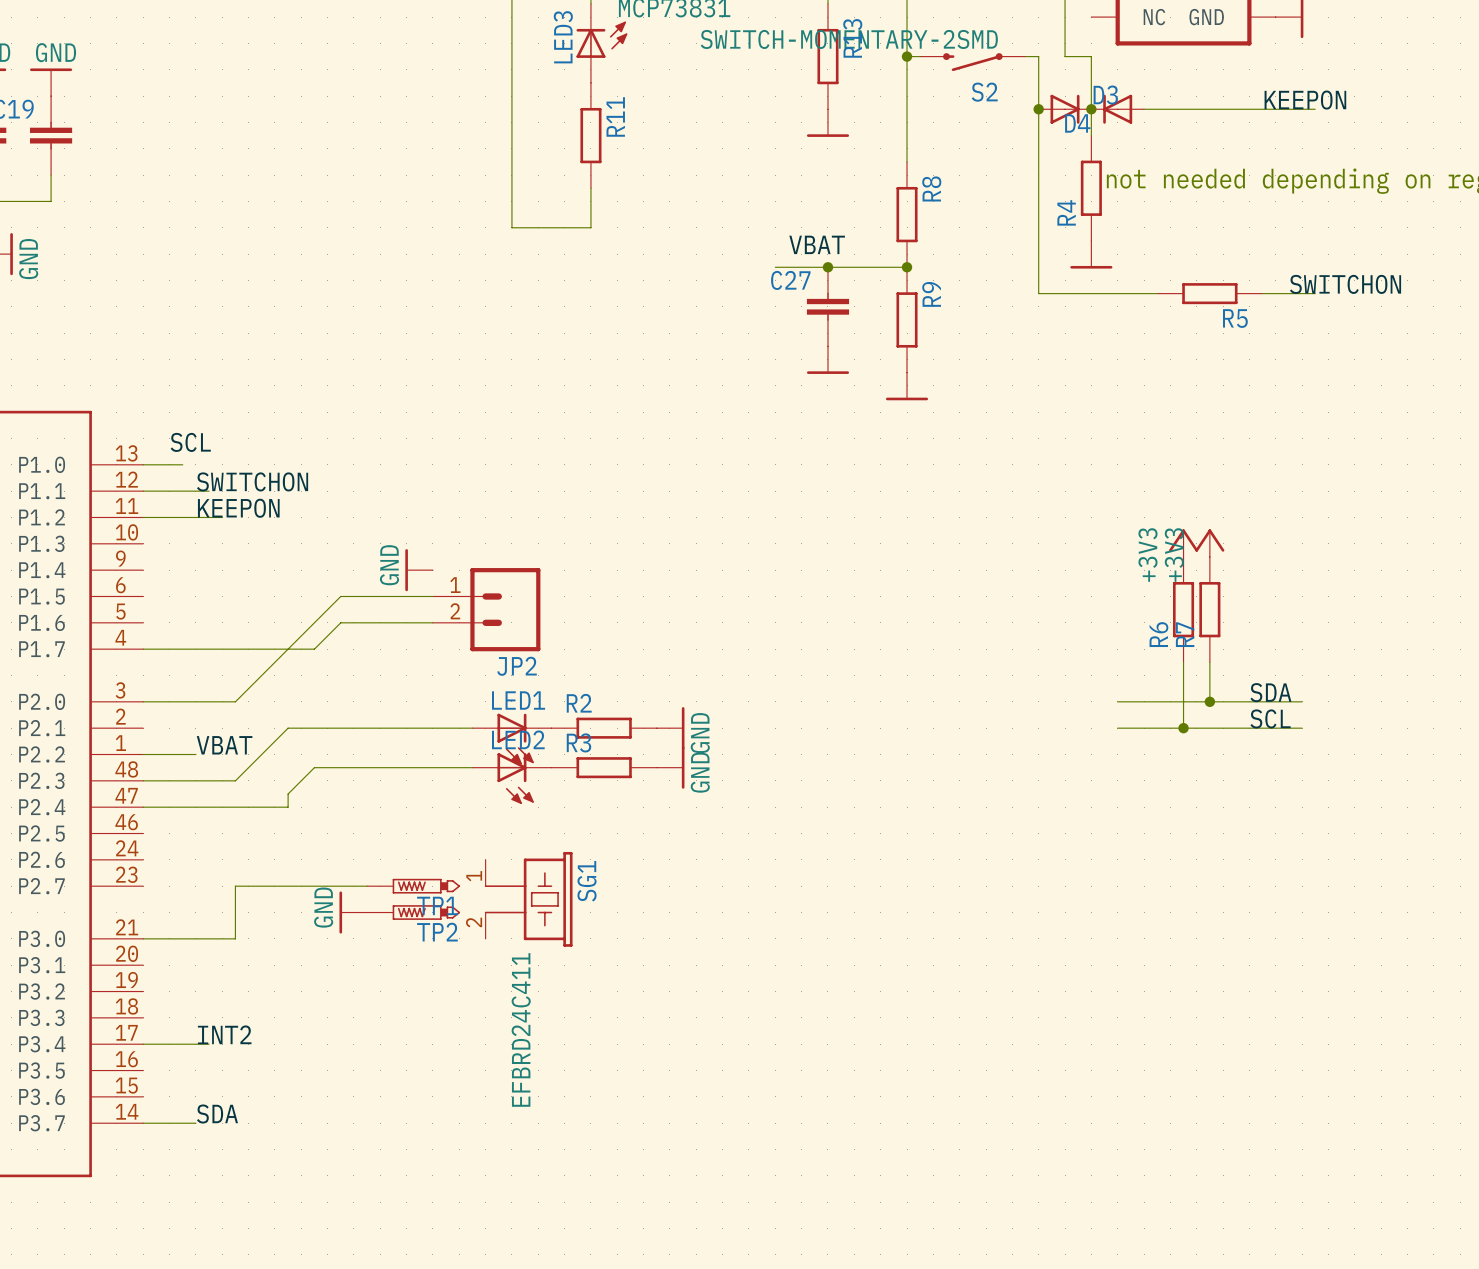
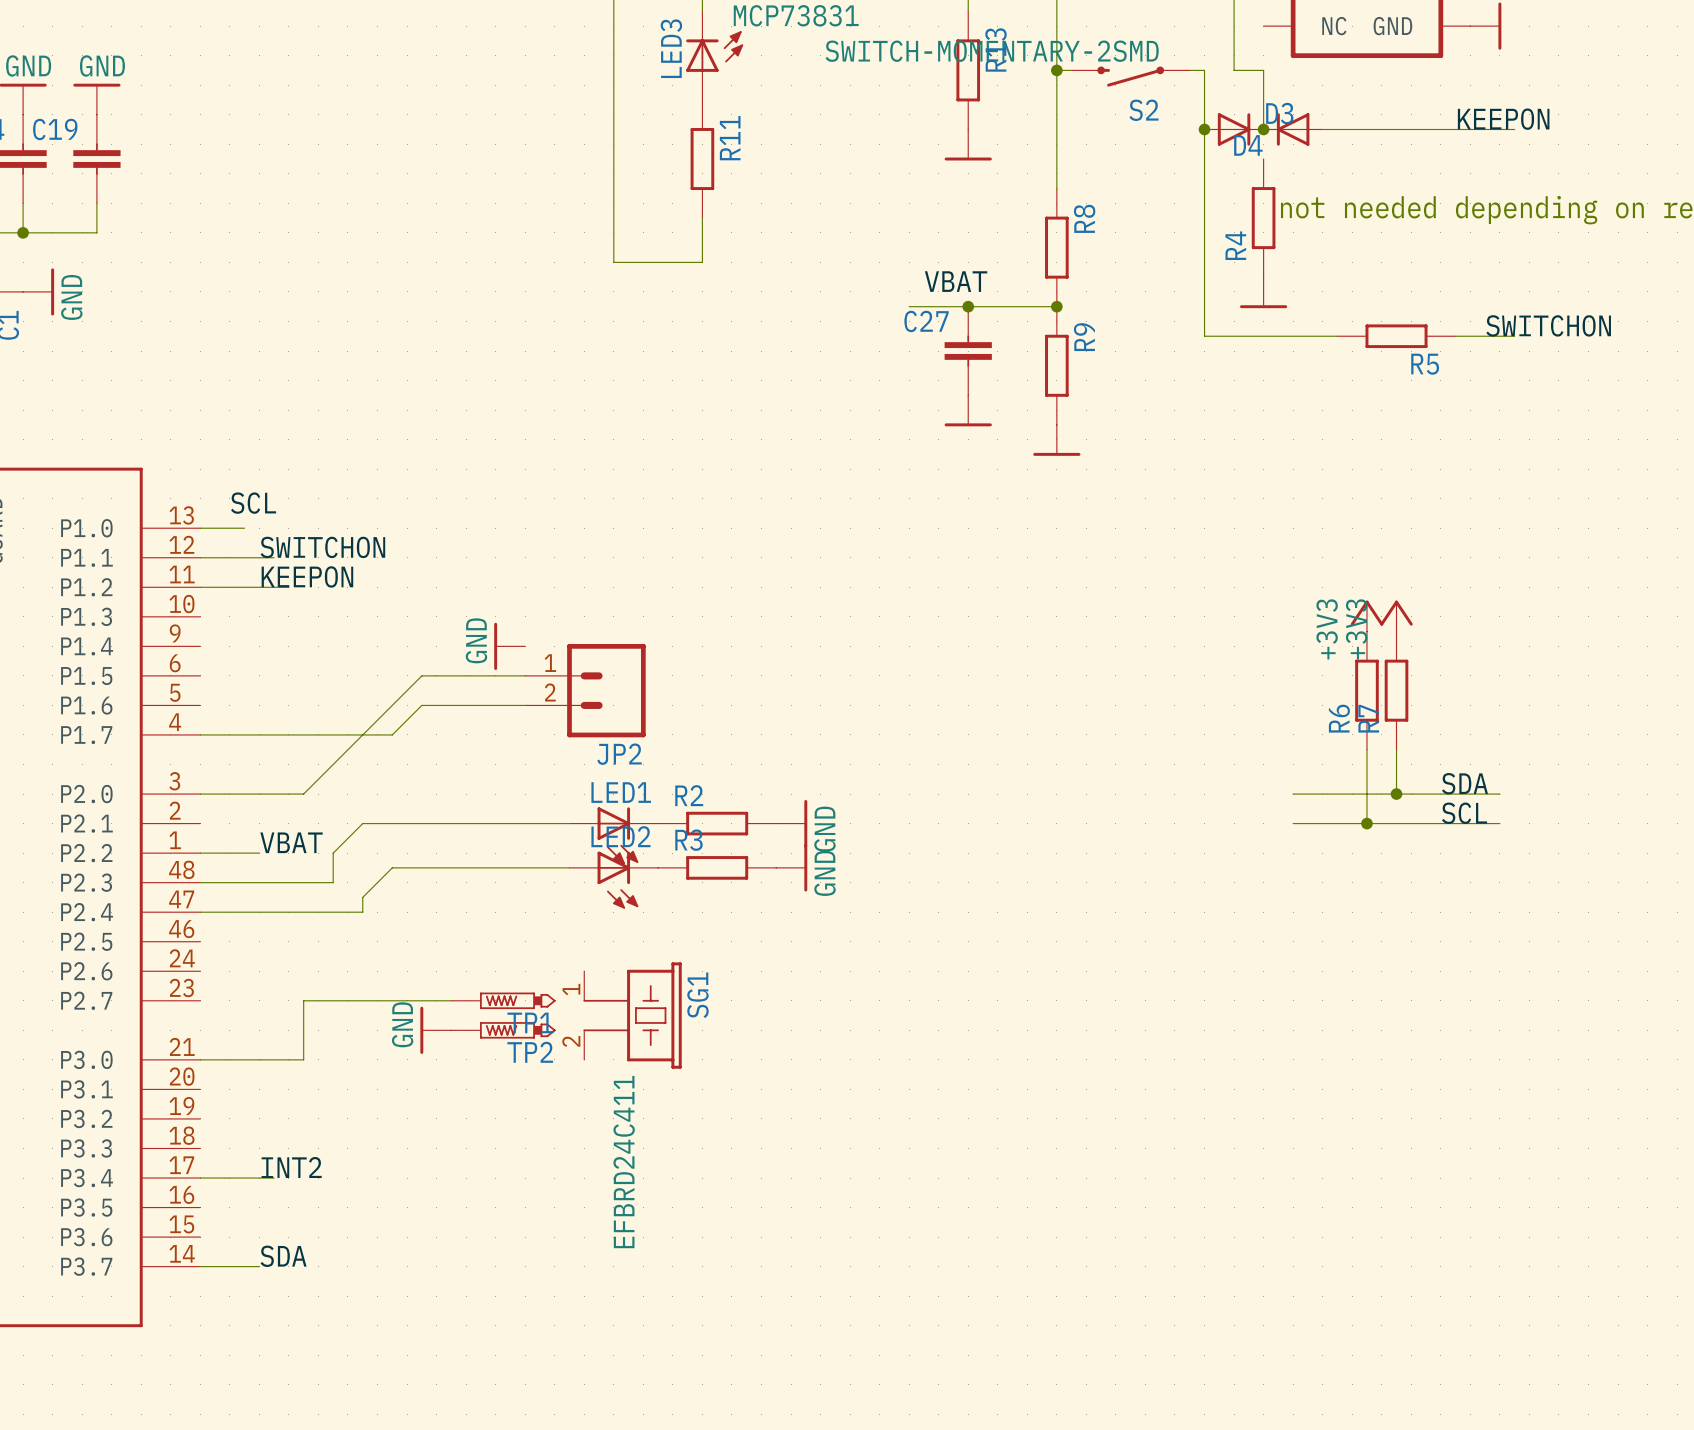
wire: (1091, 109) (1091, 135) -> none
wire: (261, 754) (235, 780) -> (333, 853) (333, 882) (303, 882)

